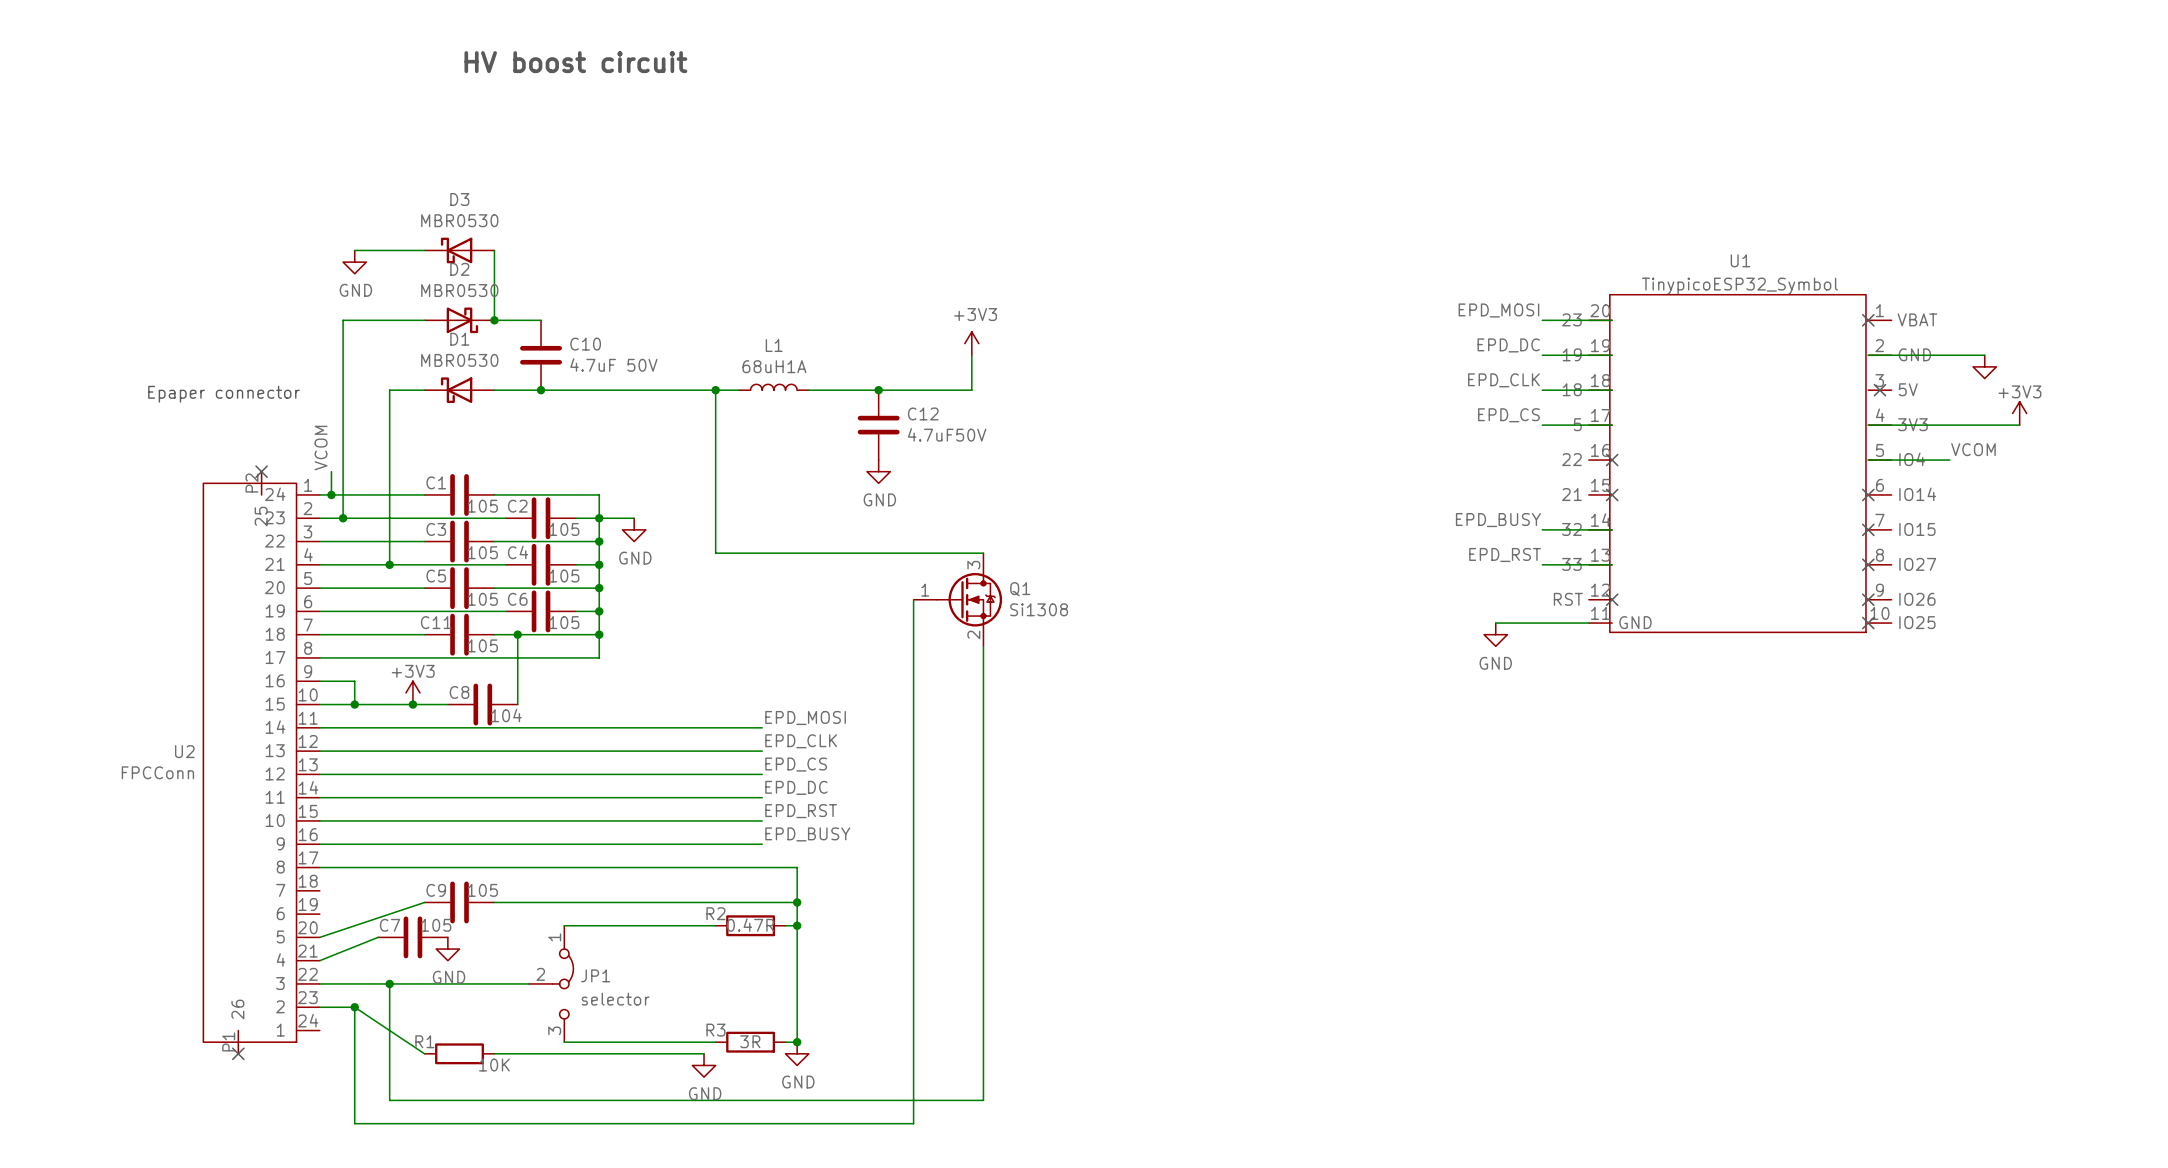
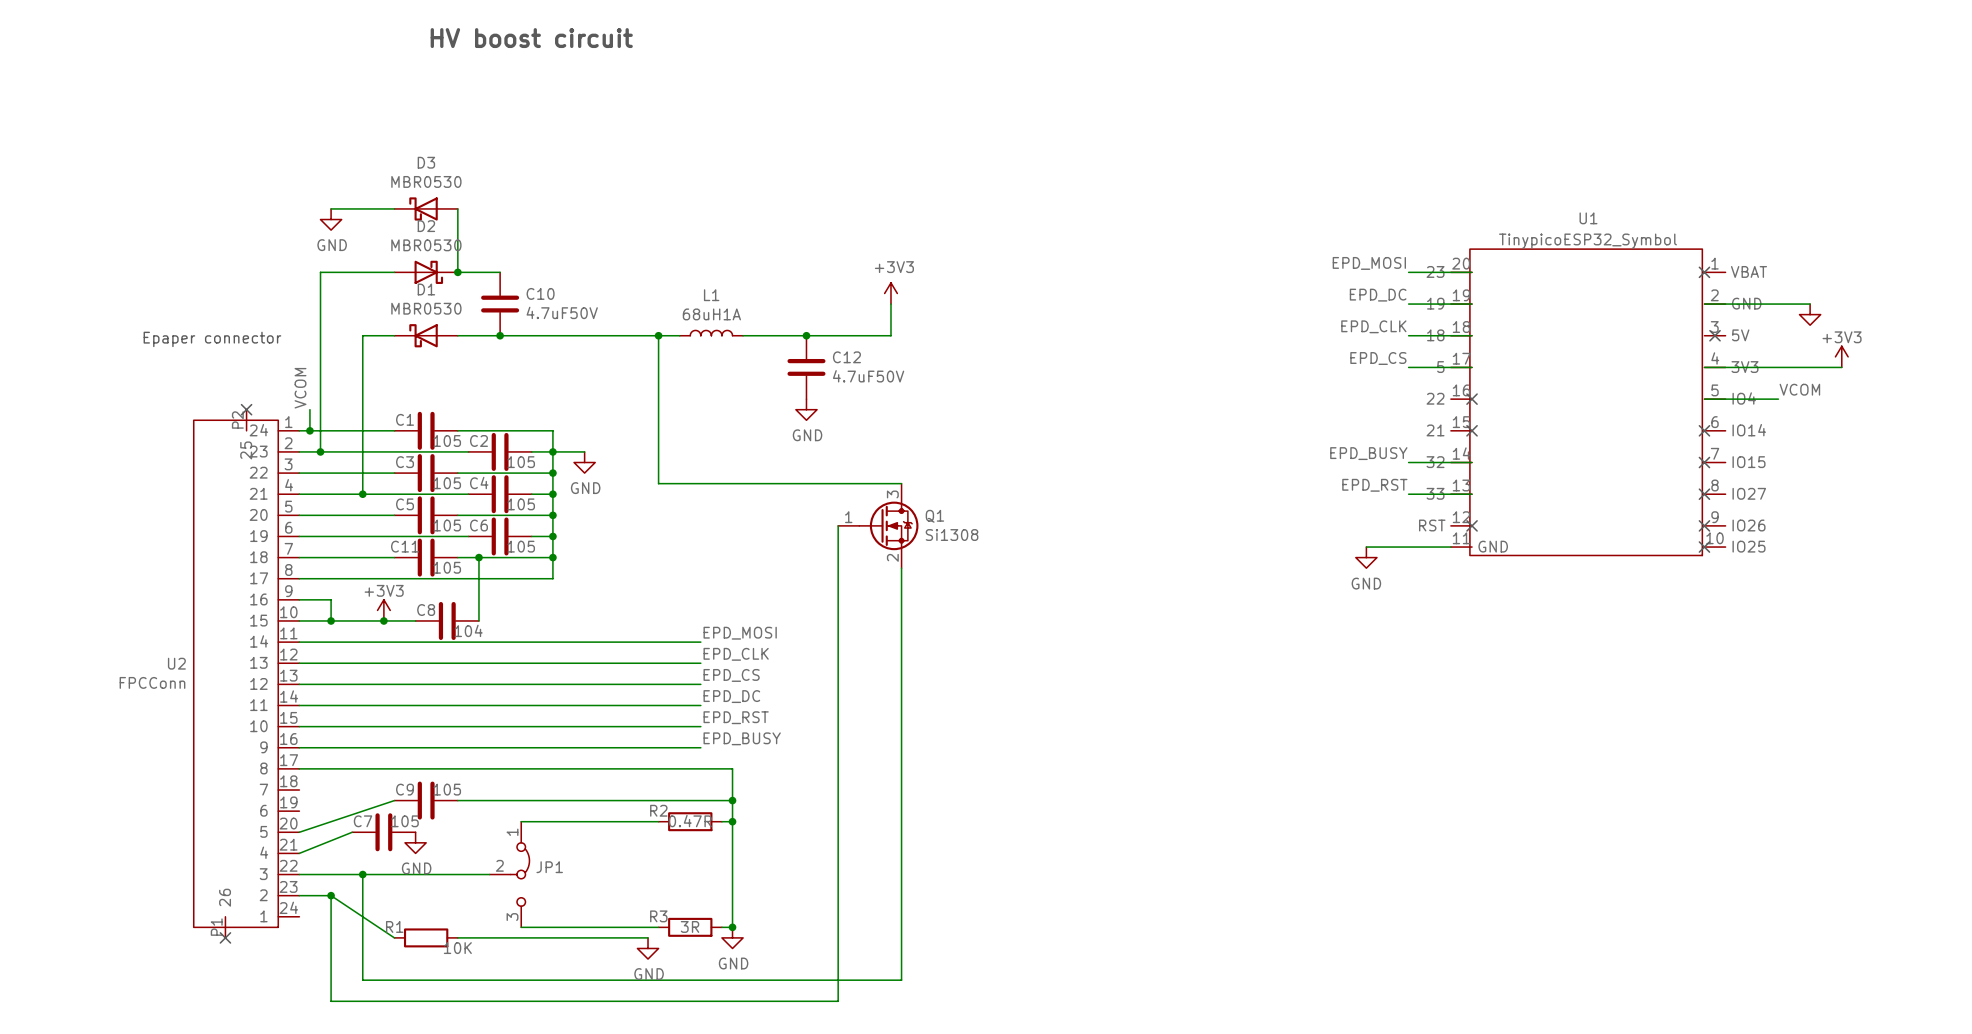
C10 value: 4.7uF 50V (613, 365) -> 4.7uF50V (562, 312)
JP1 value: selector (615, 999) -> none

